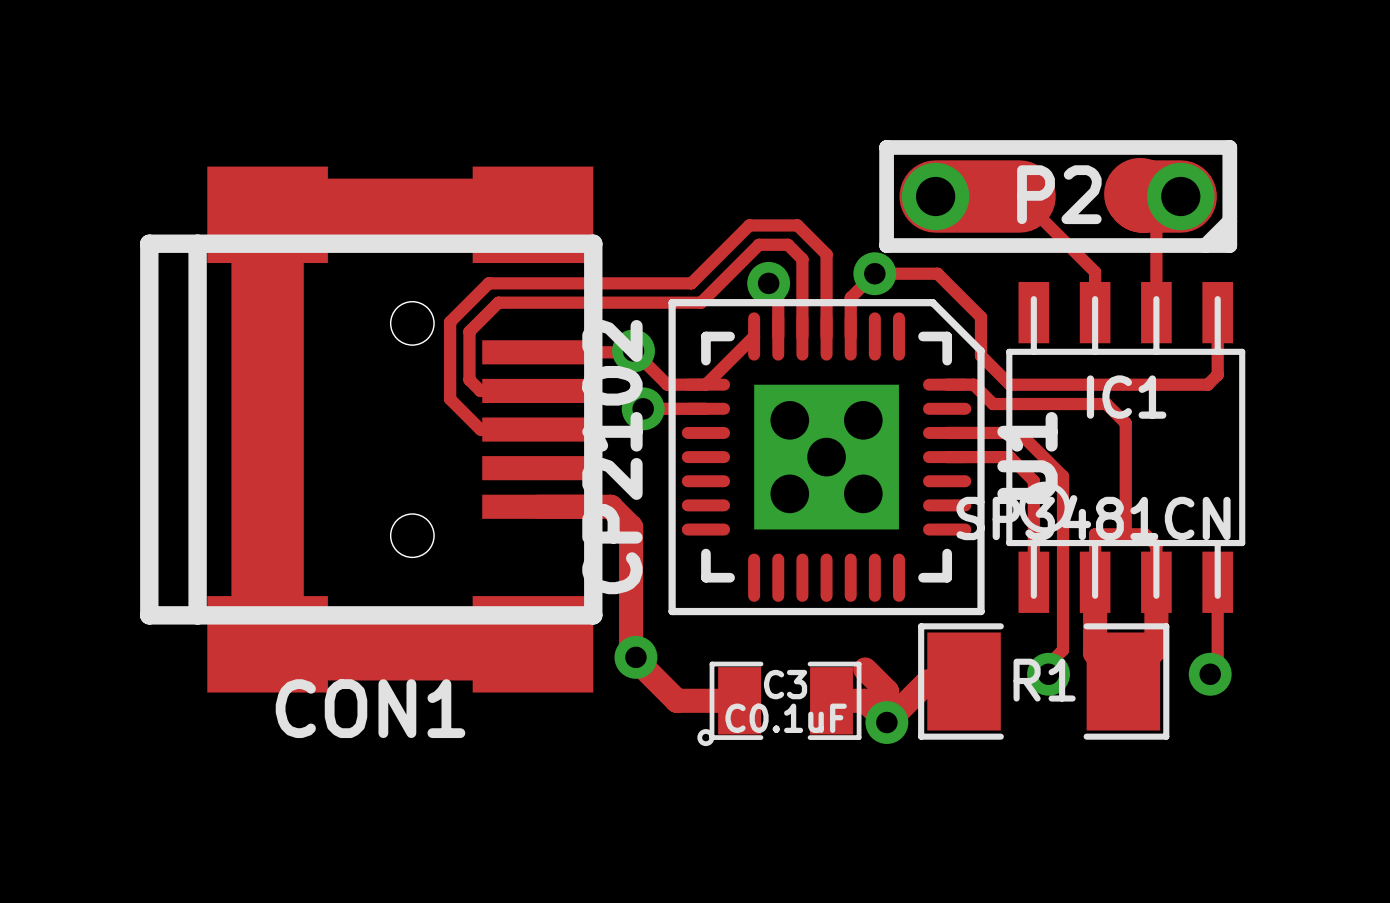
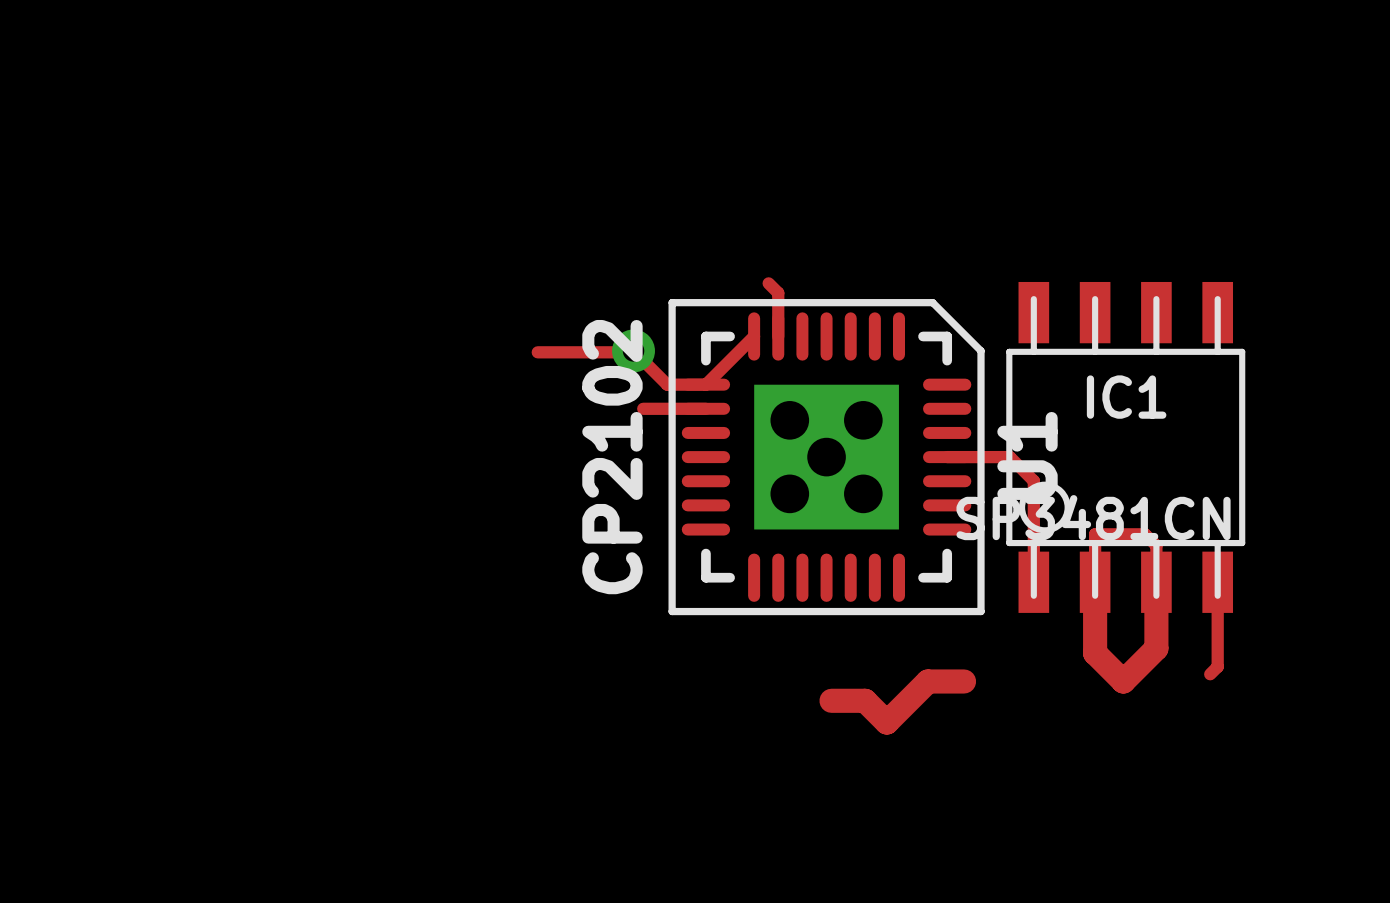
track: (1140, 194) (1142, 196) (1180, 196) (1156, 220) (1156, 312) -> none
track: (935, 196) (1019, 196) (1095, 272) (1095, 312) -> none
P2: (1058, 196) -> none
track: (532, 214) (267, 214) (267, 644) (532, 644) -> none
via: (874, 273) -> none
via: (768, 283) -> none
track: (1217, 312) (1217, 374) (1207, 384) (1009, 384) (980, 355) (980, 317) (937, 273) (874, 273) (850, 297) (850, 336) -> none
track: (802, 336) (802, 259) (787, 244) (759, 244) (701, 302) (498, 302) (469, 331) (469, 379) (480, 390) (537, 390) -> none
track: (826, 336) (826, 254) (797, 225) (749, 225) (691, 283) (488, 283) (450, 321) (450, 399) (480, 429) (537, 429) -> none
track: (947, 384) (973, 384) (993, 404) (1106, 404) (1125, 423) (1125, 534) -> none
via: (643, 408) -> none
CON1: (371, 429) -> none
track: (947, 432) (1019, 432) (1063, 476) (1063, 650) (1048, 664) (1048, 674) -> none
track: (537, 506) (610, 506) (631, 527) (631, 654) (676, 700) (739, 700) -> none
via: (635, 657) -> none
track: (865, 669) (886, 691) (886, 722) -> none
via: (1048, 674) -> none
via: (1210, 674) -> none
R1: (1043, 681) -> none
C3: C0.1uF (779, 703) -> none
via: (886, 722) -> none

